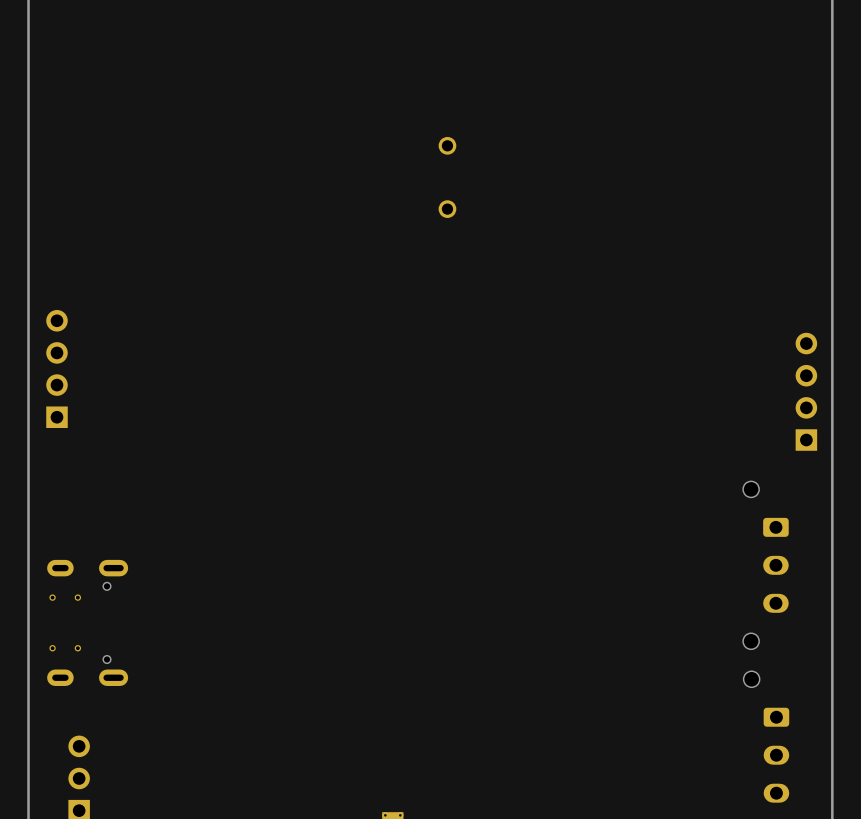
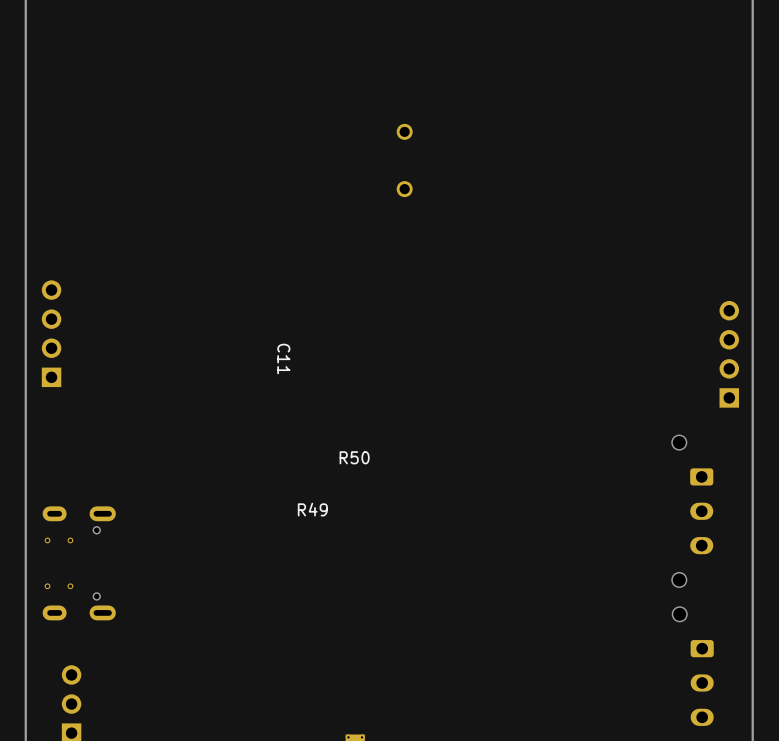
text: none -> C11 (283, 358)
text: none -> R50 (354, 457)
text: none -> R49 (312, 509)

